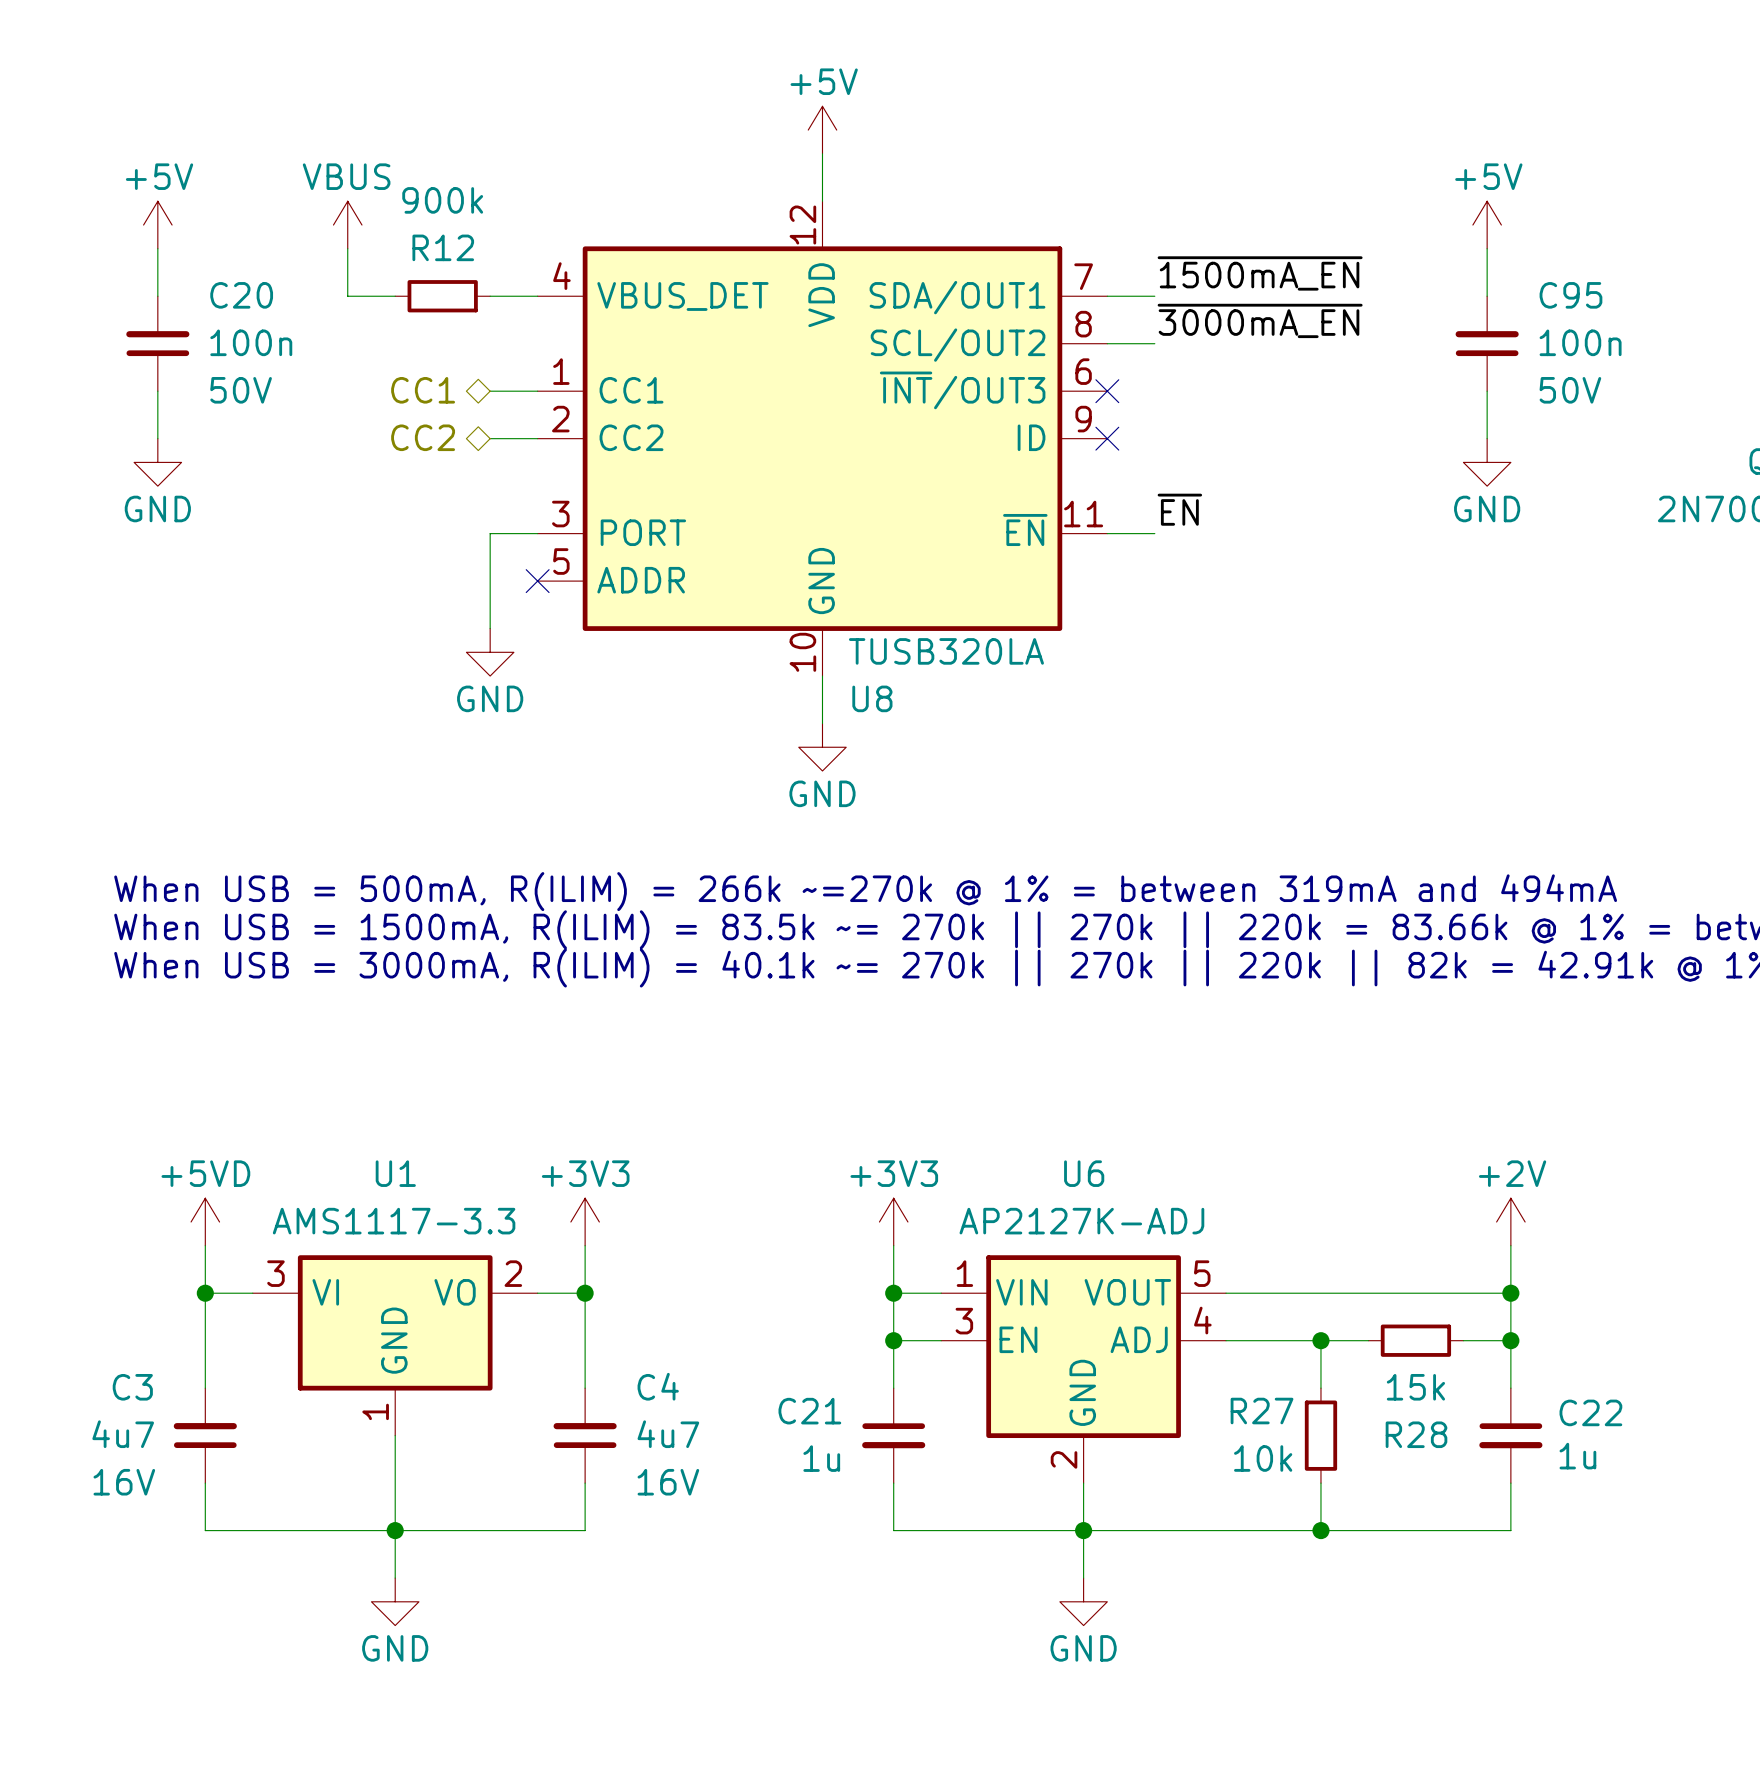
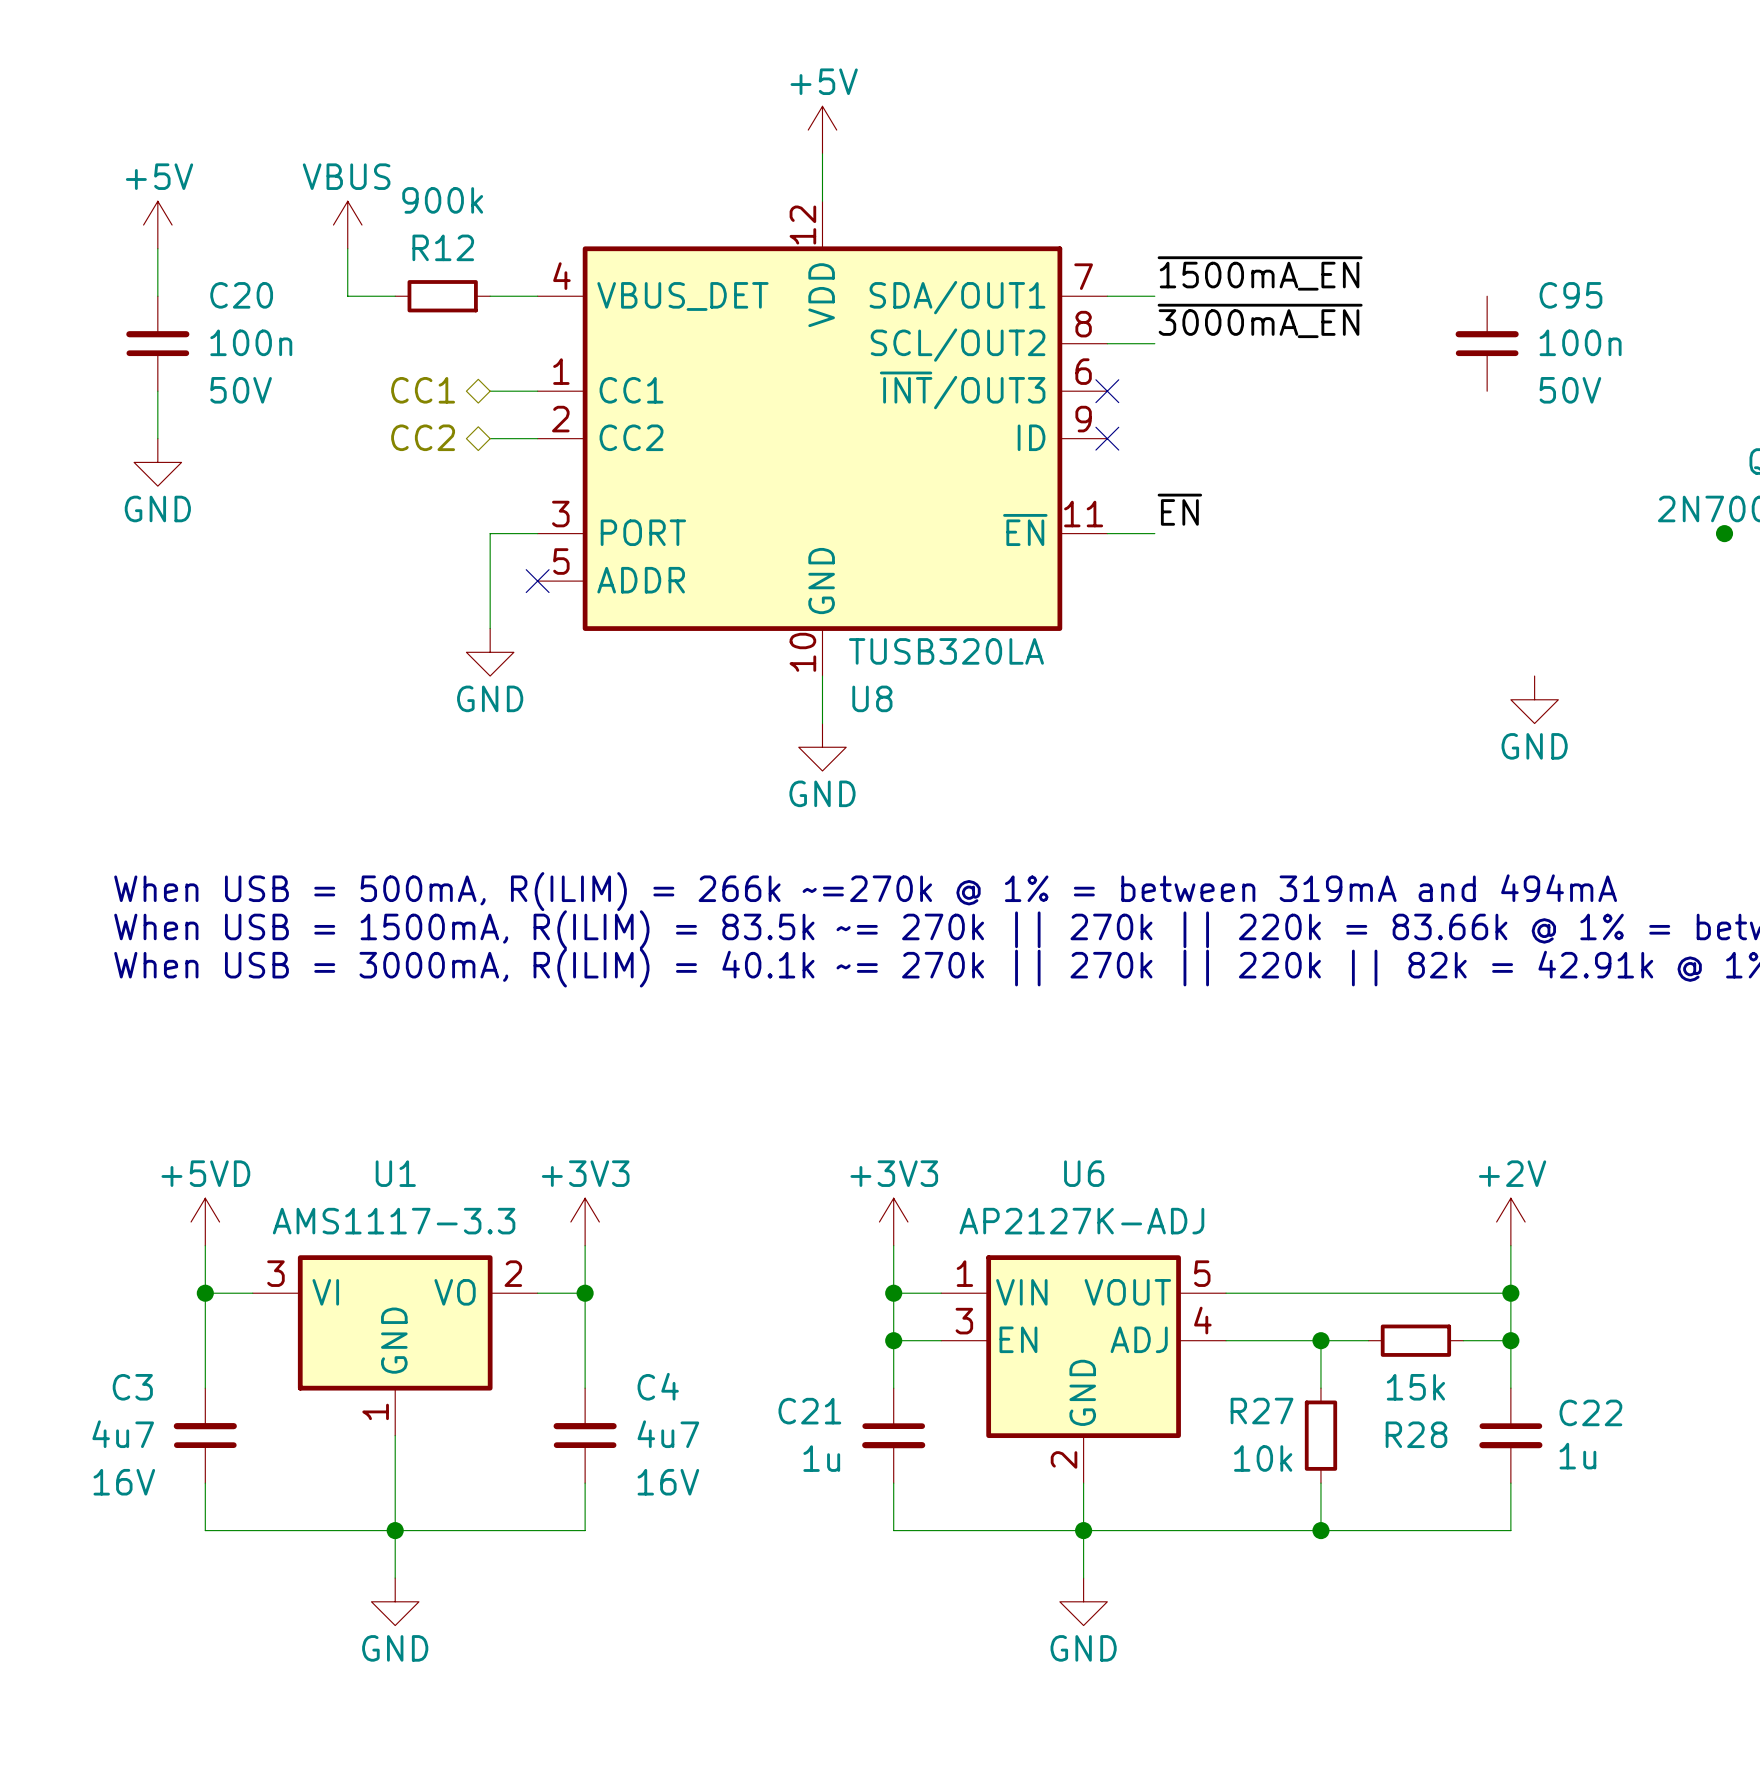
power symbol: +5V (1487, 225) -> none
wire: (1487, 248) (1487, 296) -> none
wire: (1487, 391) (1487, 438) -> none
power symbol: GND (1487, 462) -> none
junction: none -> (1724, 533)
power symbol: none -> GND (1534, 699)

